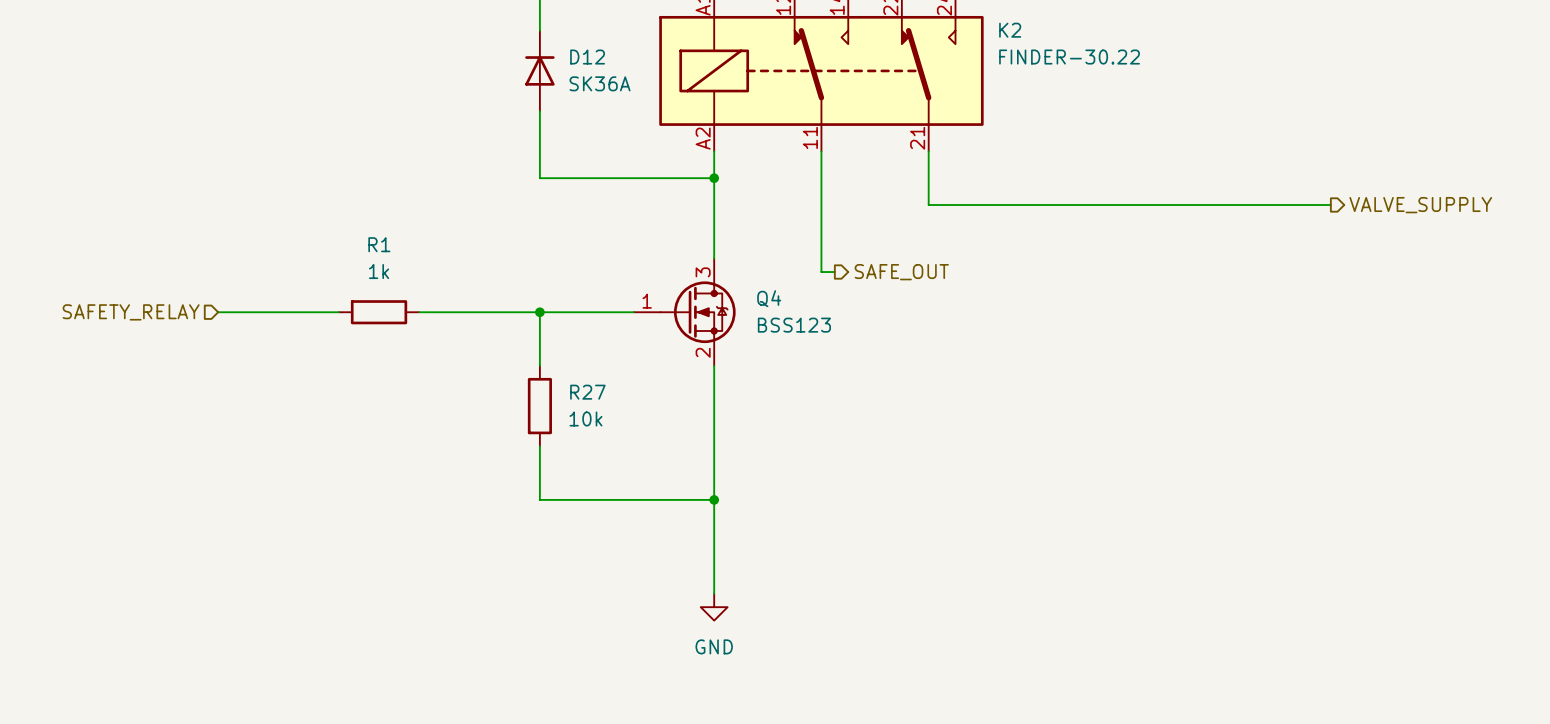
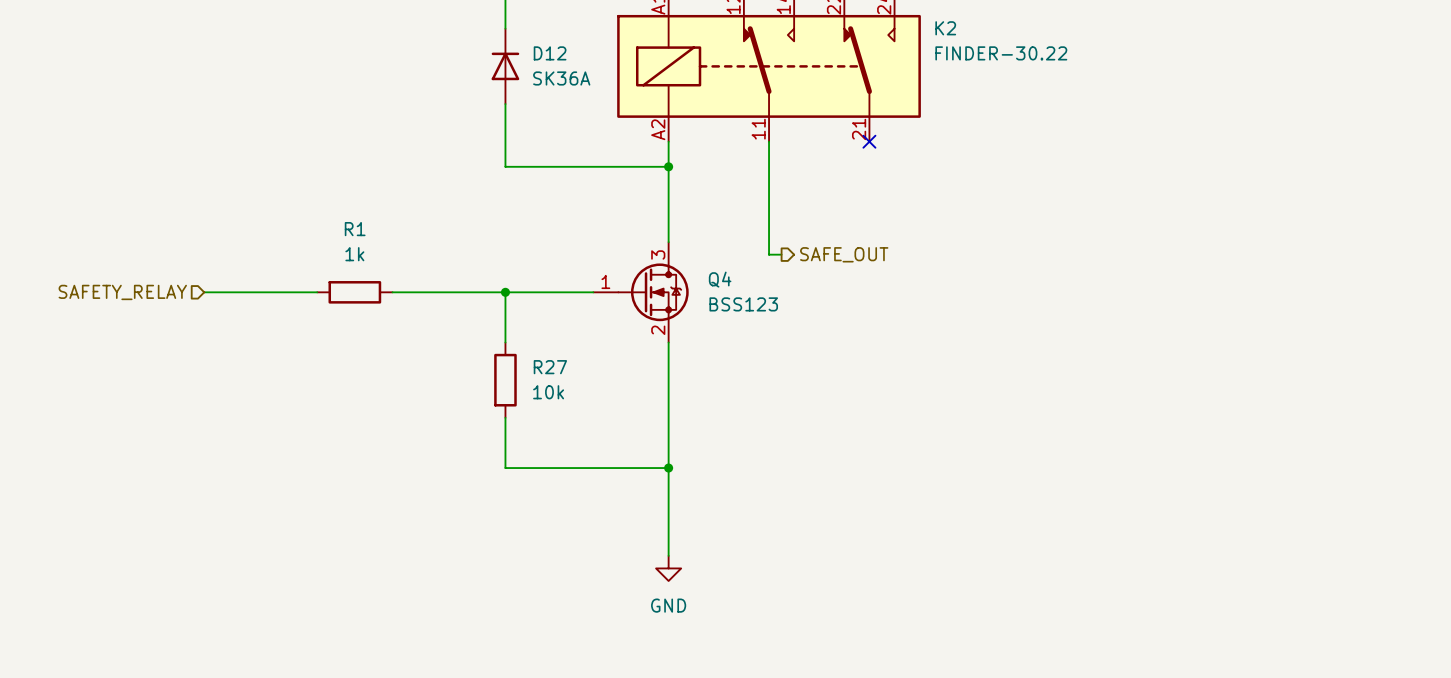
wire: (928, 151) (928, 204) (1330, 204) -> none
no-connect mark: none -> (869, 141)
hierarchical label: VALVE_SUPPLY (1420, 205) -> none

